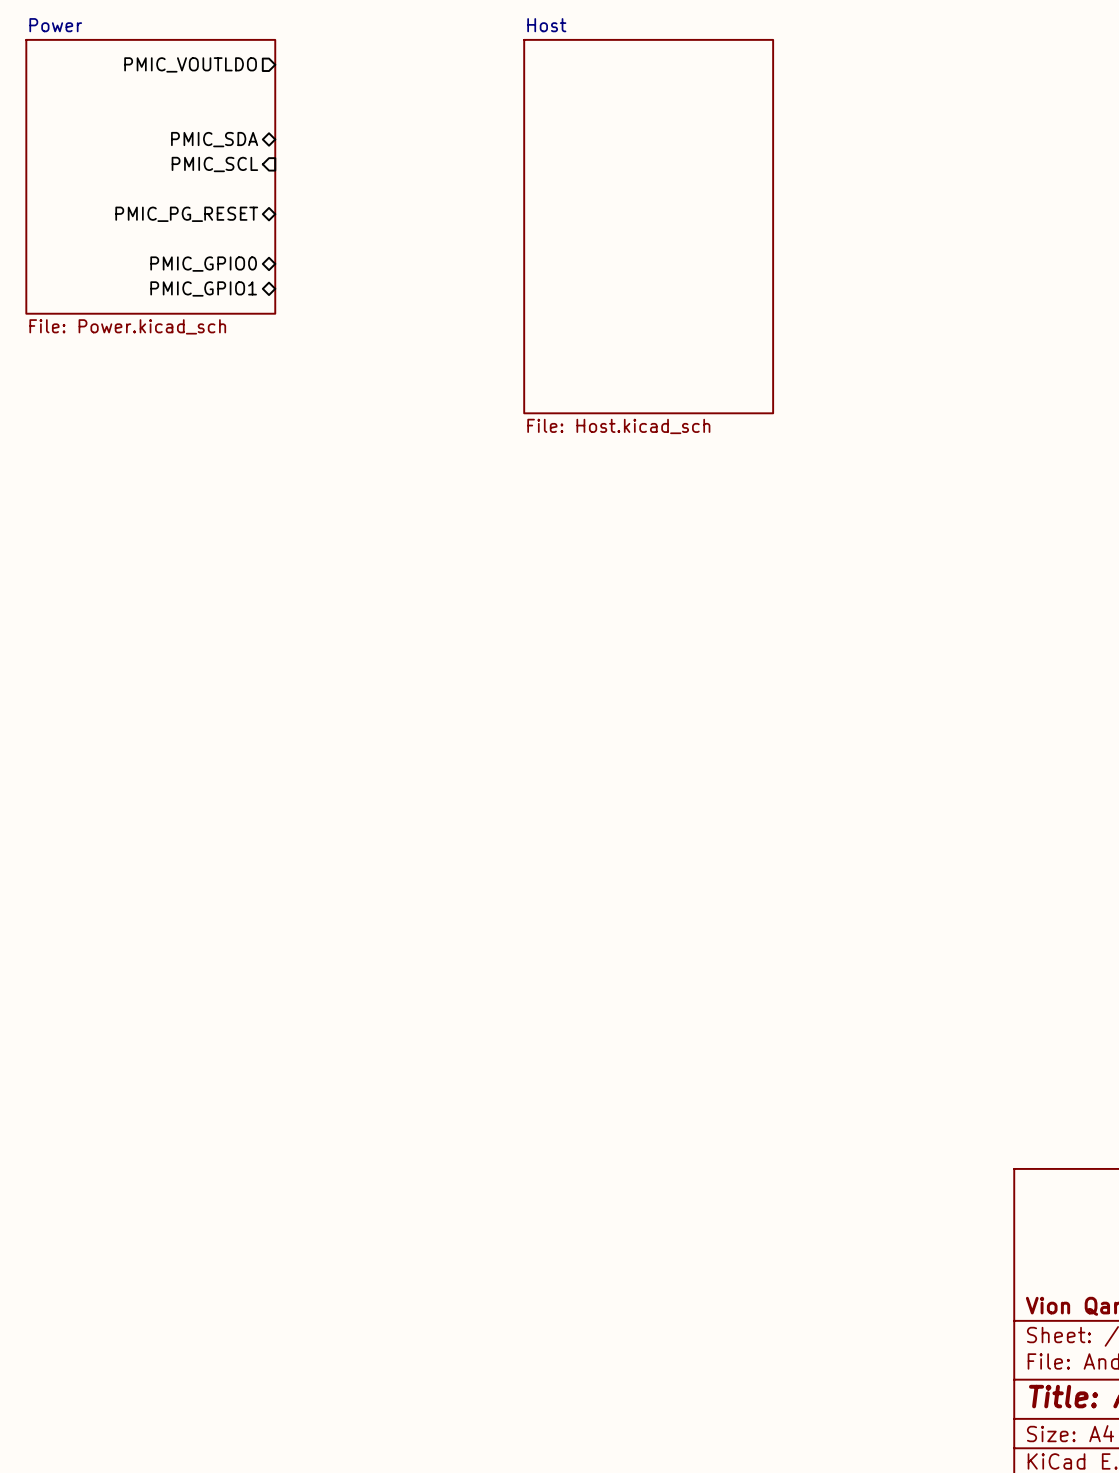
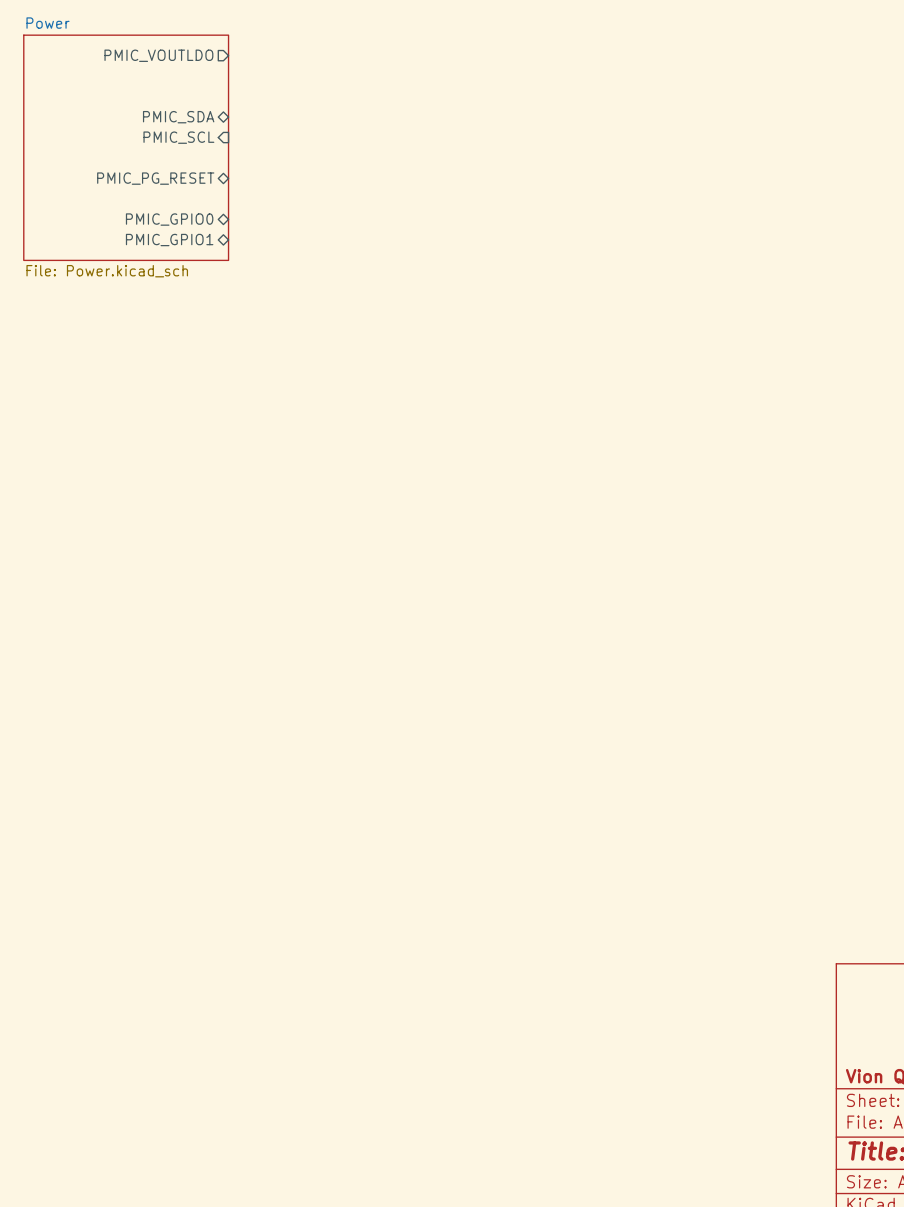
sheet Host: File: Host.kicad_sch (648, 226) -> none

